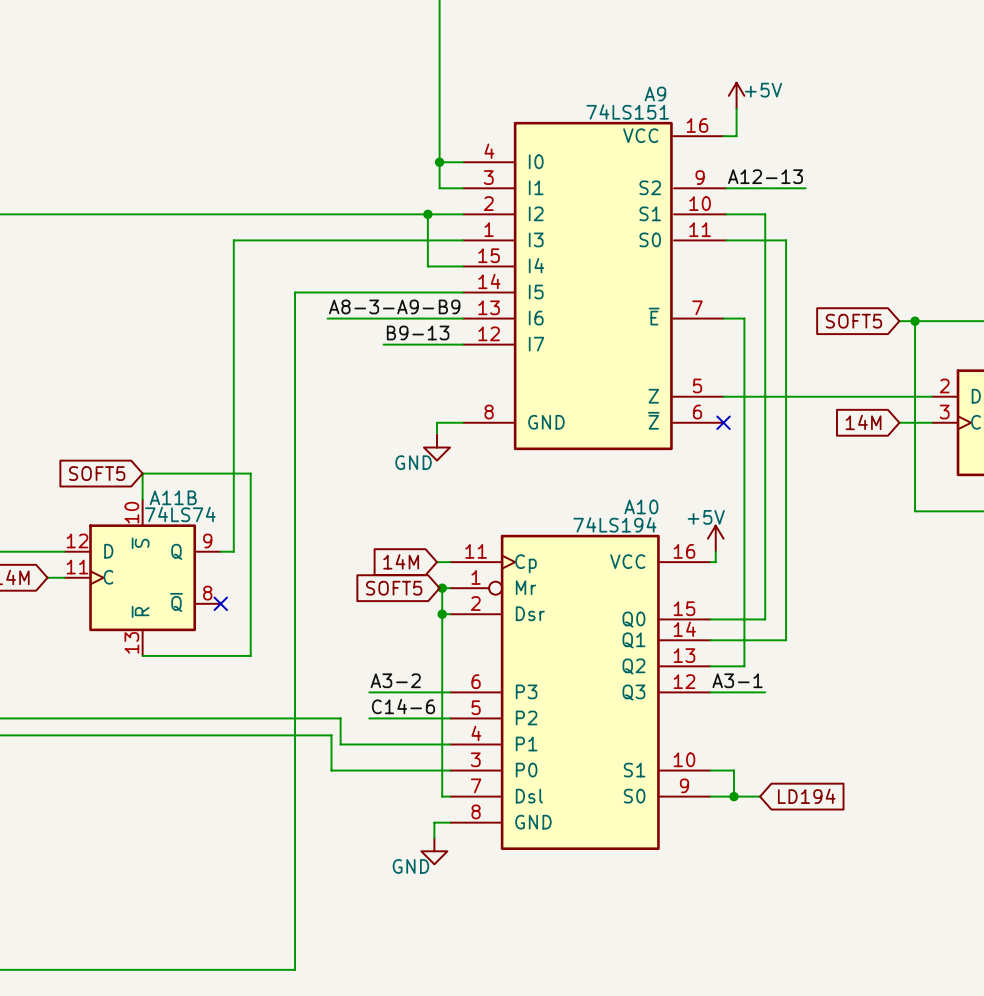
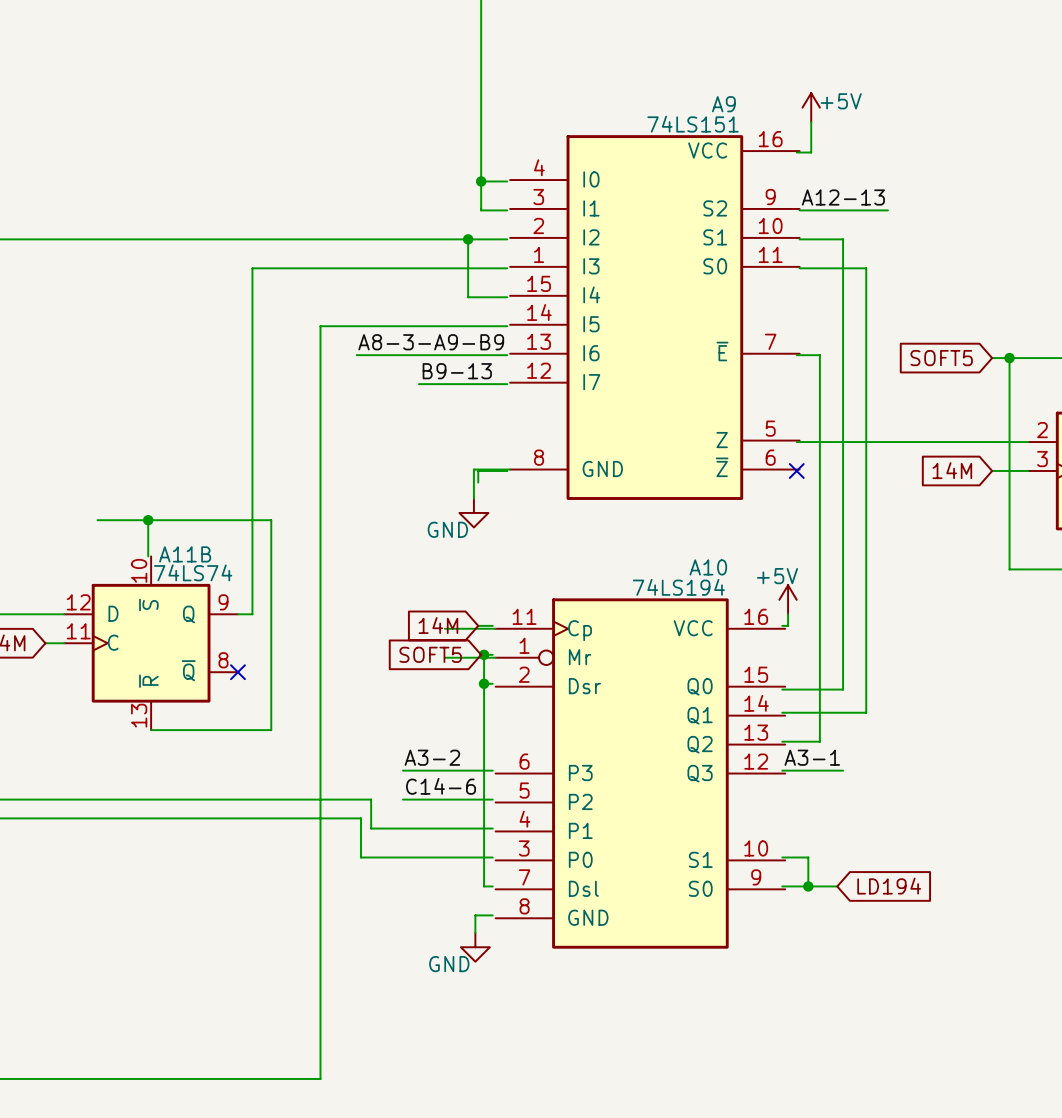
A9 symbol: [463, 121, 727, 451] -> [510, 135, 800, 500]
wire: none -> (510, 469) (473, 469) (473, 498)
power symbol position: GND (436, 447) -> GND (473, 512)
wire: none -> (148, 520) (148, 556)
junction: none -> (148, 520)
global label: SOFT5 (97, 473) -> none
wire: (250, 473) (142, 473) (142, 499) -> (271, 527) (271, 520) (97, 520)
A10 symbol: [450, 534, 711, 851] -> [495, 598, 786, 949]
wire: none -> (444, 628) (495, 628)
wire: none -> (444, 657) (495, 657)

